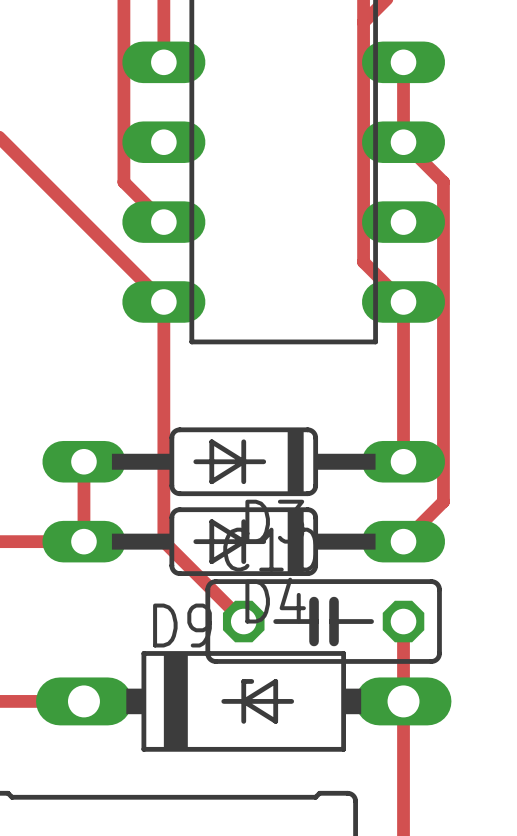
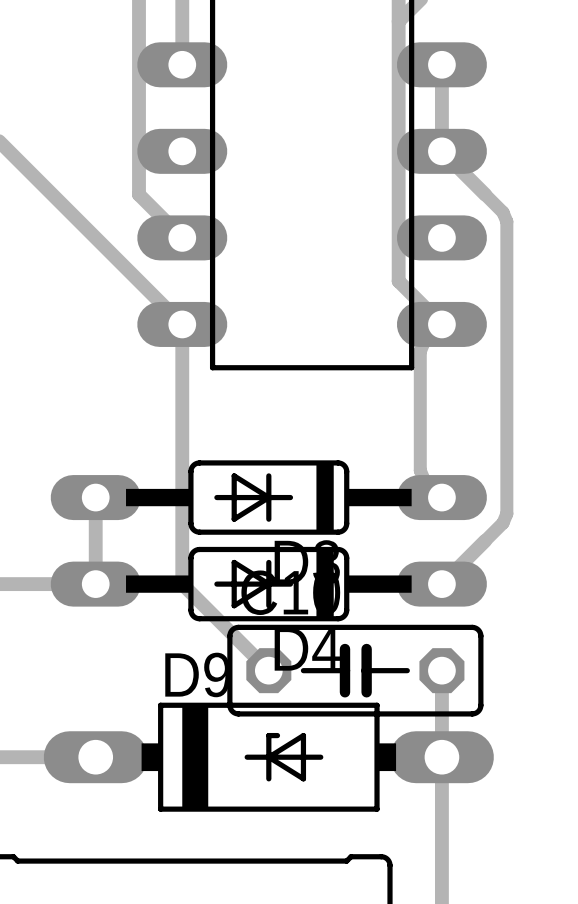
track: (443, 182) (443, 501) -> (485, 194) (503, 212) (506, 221) (506, 513) (503, 522) (485, 540)
track: (403, 301) (403, 461) -> (441, 324) (424, 342) (420, 351) (420, 470) (424, 479) (441, 497)

